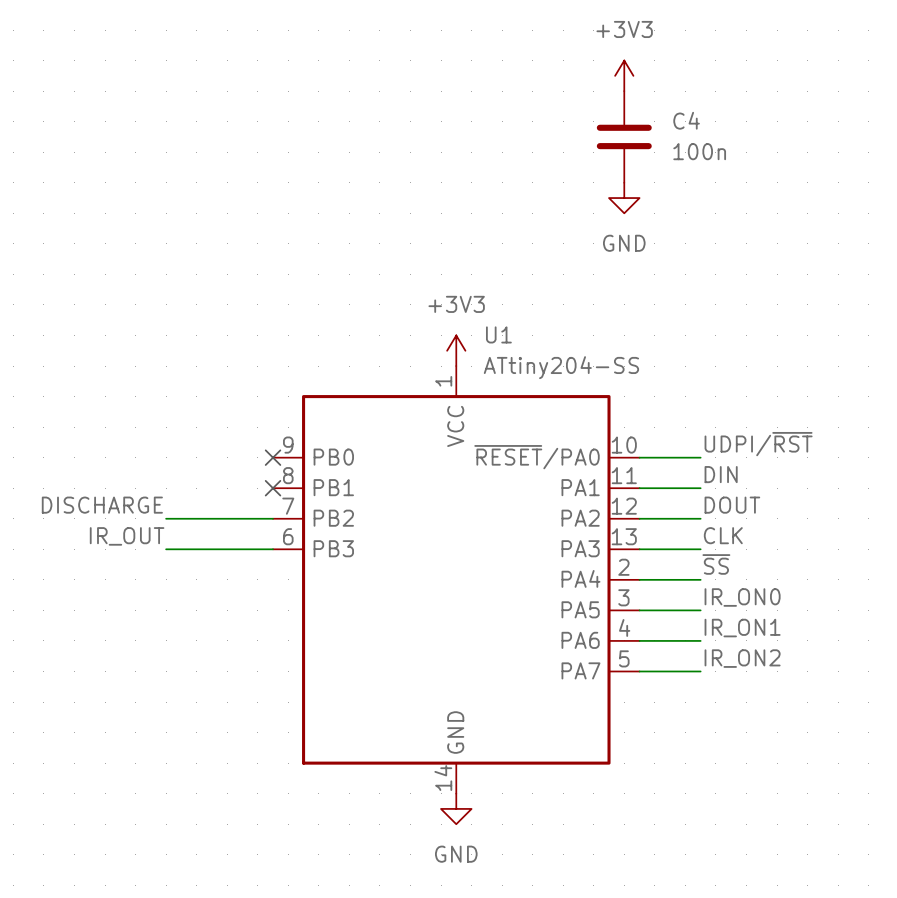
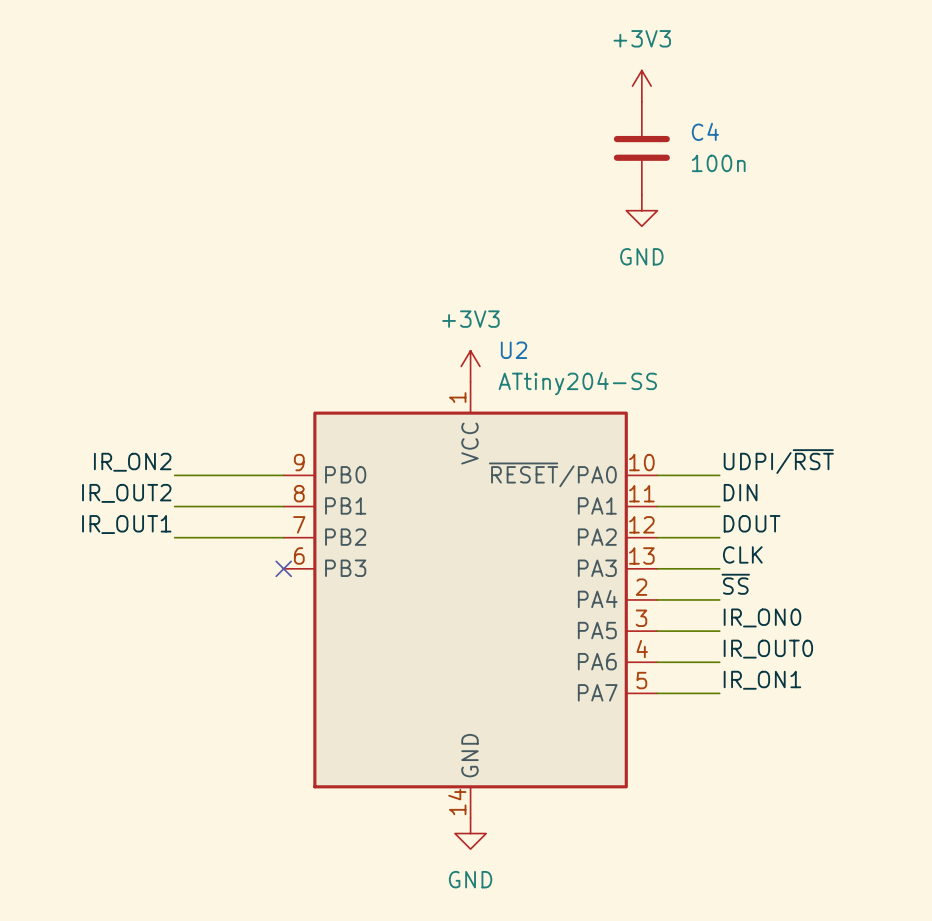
U1 name: U1 (498, 334) -> U2 (514, 350)
label: none -> IR_ON2 (132, 462)
wire: none -> (174, 475) (283, 475)
no-connect mark: (273, 457) -> none
label: none -> IR_OUT2 (126, 493)
no-connect mark: (273, 488) -> none
label: DISCHARGE (102, 505) -> IR_OUT1 (126, 524)
label: IR_OUT (127, 536) -> none
wire: (166, 549) (273, 549) -> (174, 506) (283, 506)
no-connect mark: none -> (283, 568)
label: IR_ON1 (742, 628) -> IR_OUT0 (768, 649)
label: IR_ON2 (742, 658) -> IR_ON1 (762, 680)

